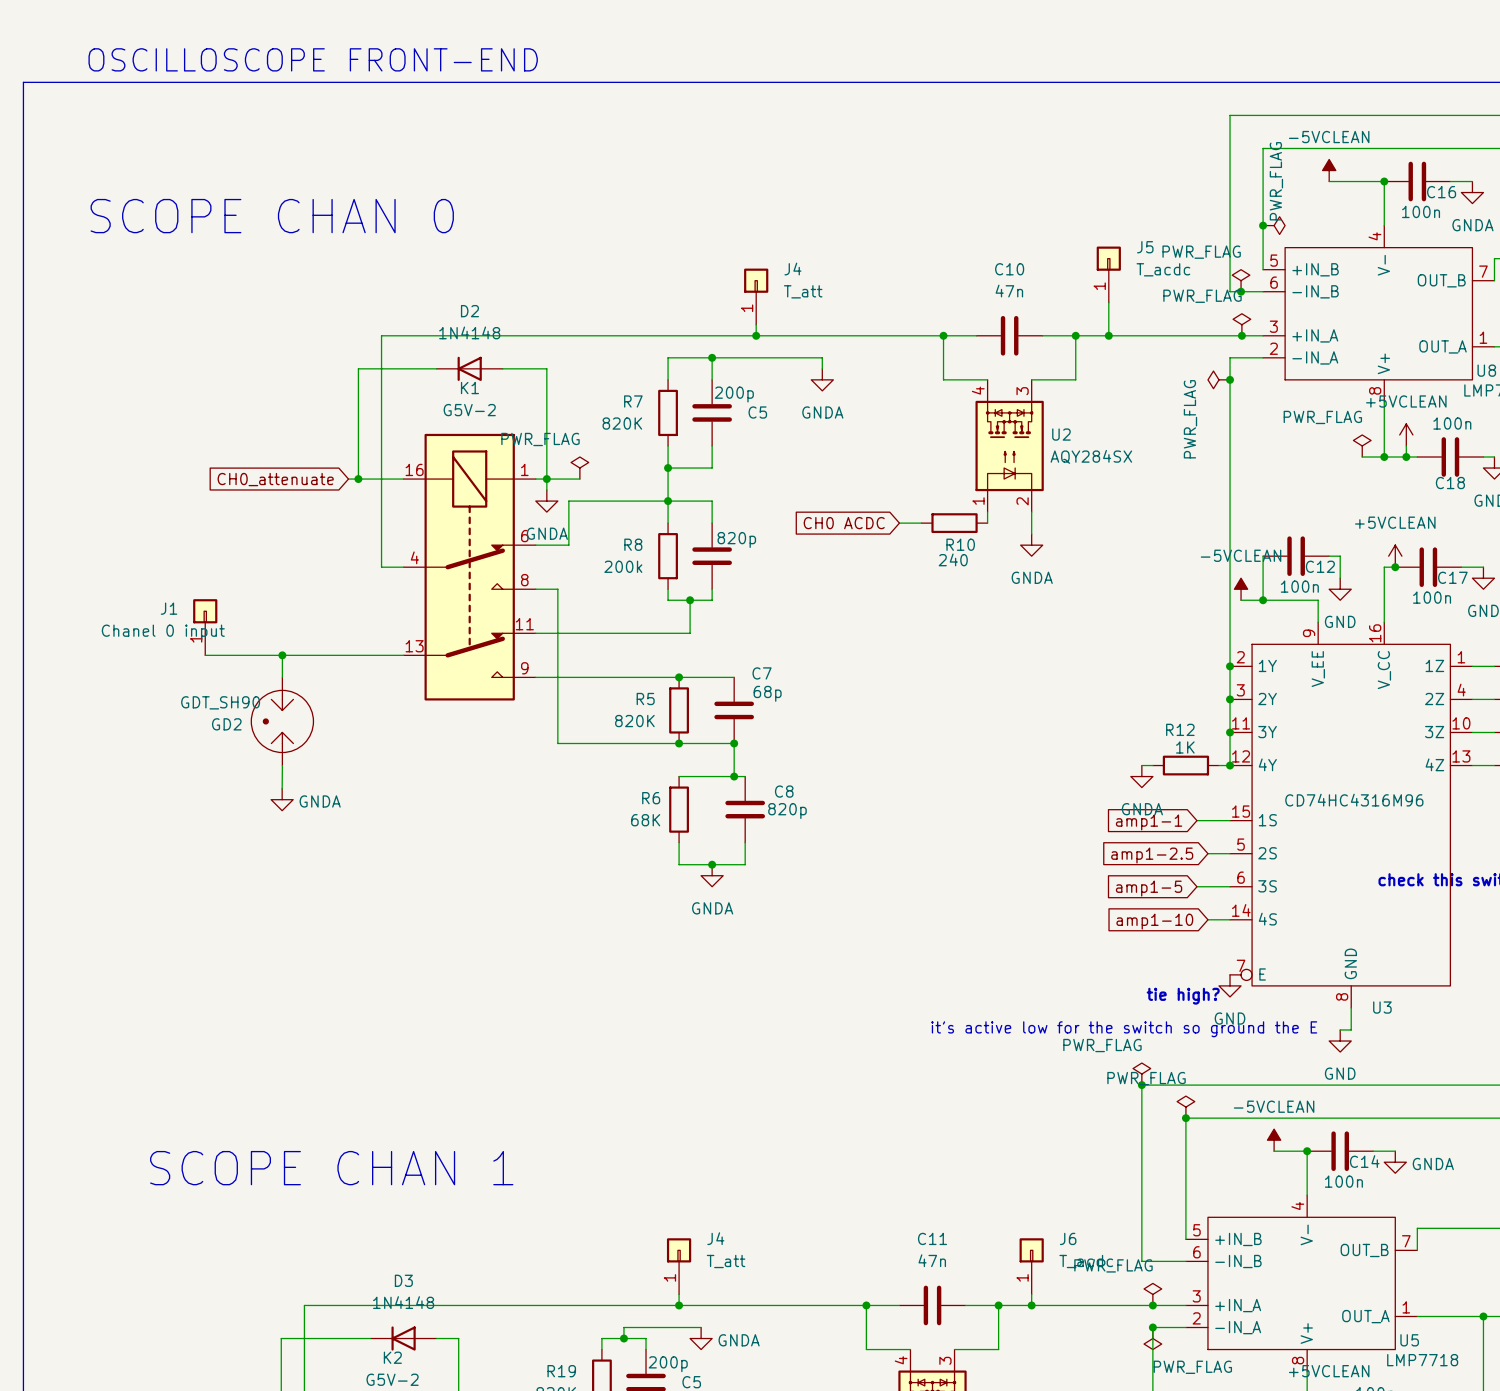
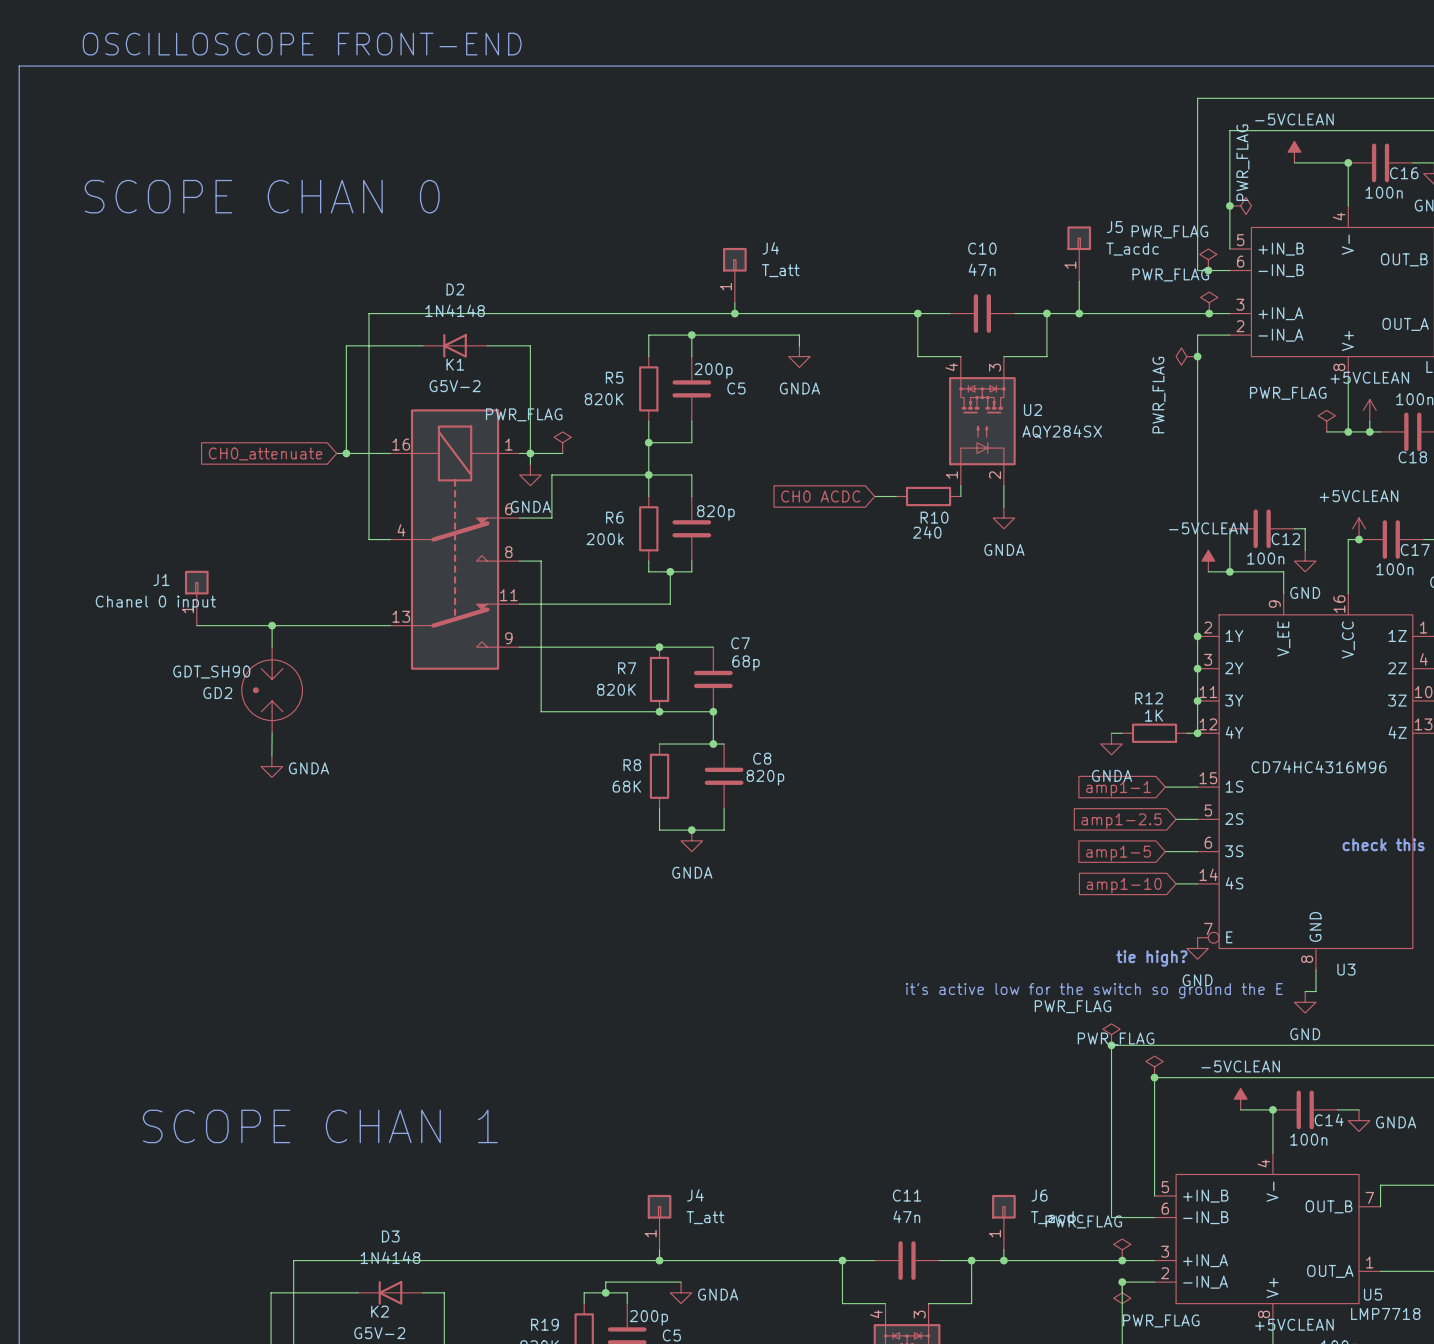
R7 name: R7 (633, 401) -> R5 (614, 377)
R8 name: R8 (633, 544) -> R6 (614, 517)
R5 name: R5 (645, 699) -> R7 (627, 668)
R6 name: R6 (651, 798) -> R8 (632, 765)

